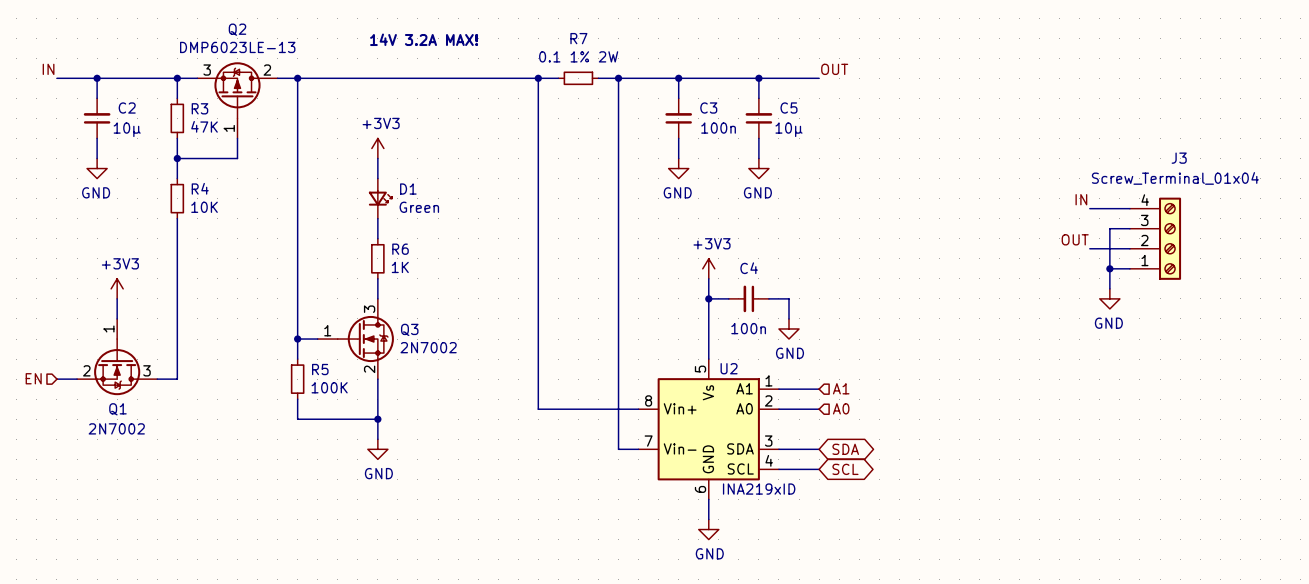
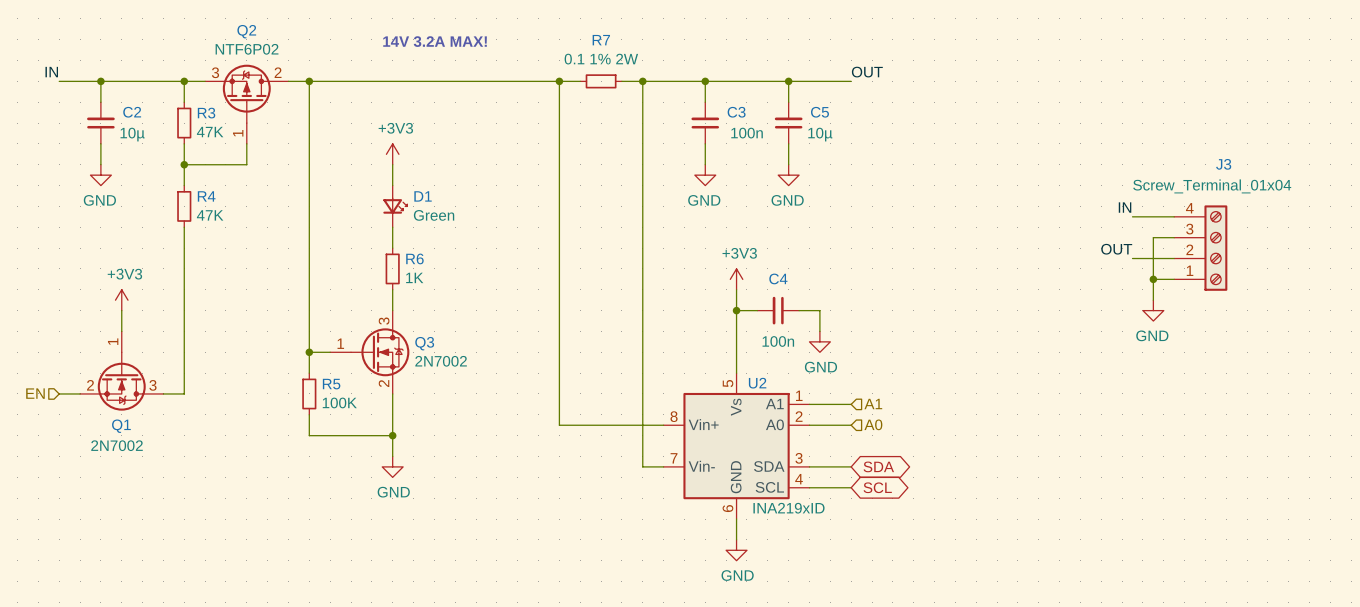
Q2 value: DMP6023LE-13 (237, 47) -> NTF6P02 (247, 49)
R4 value: 10K (204, 207) -> 47K (210, 215)

